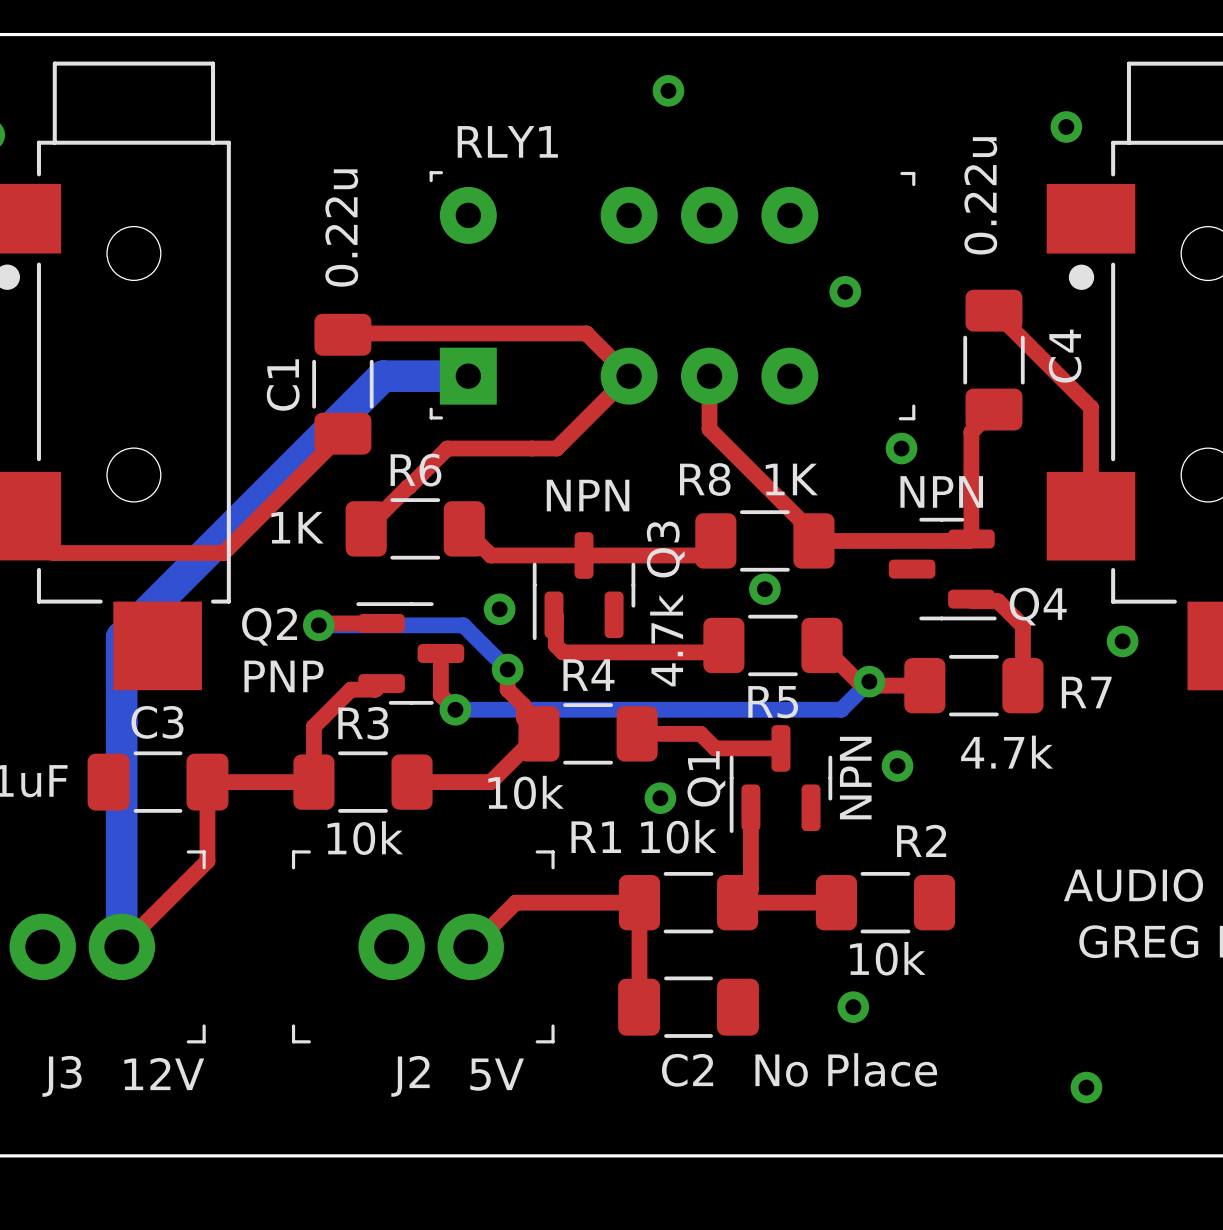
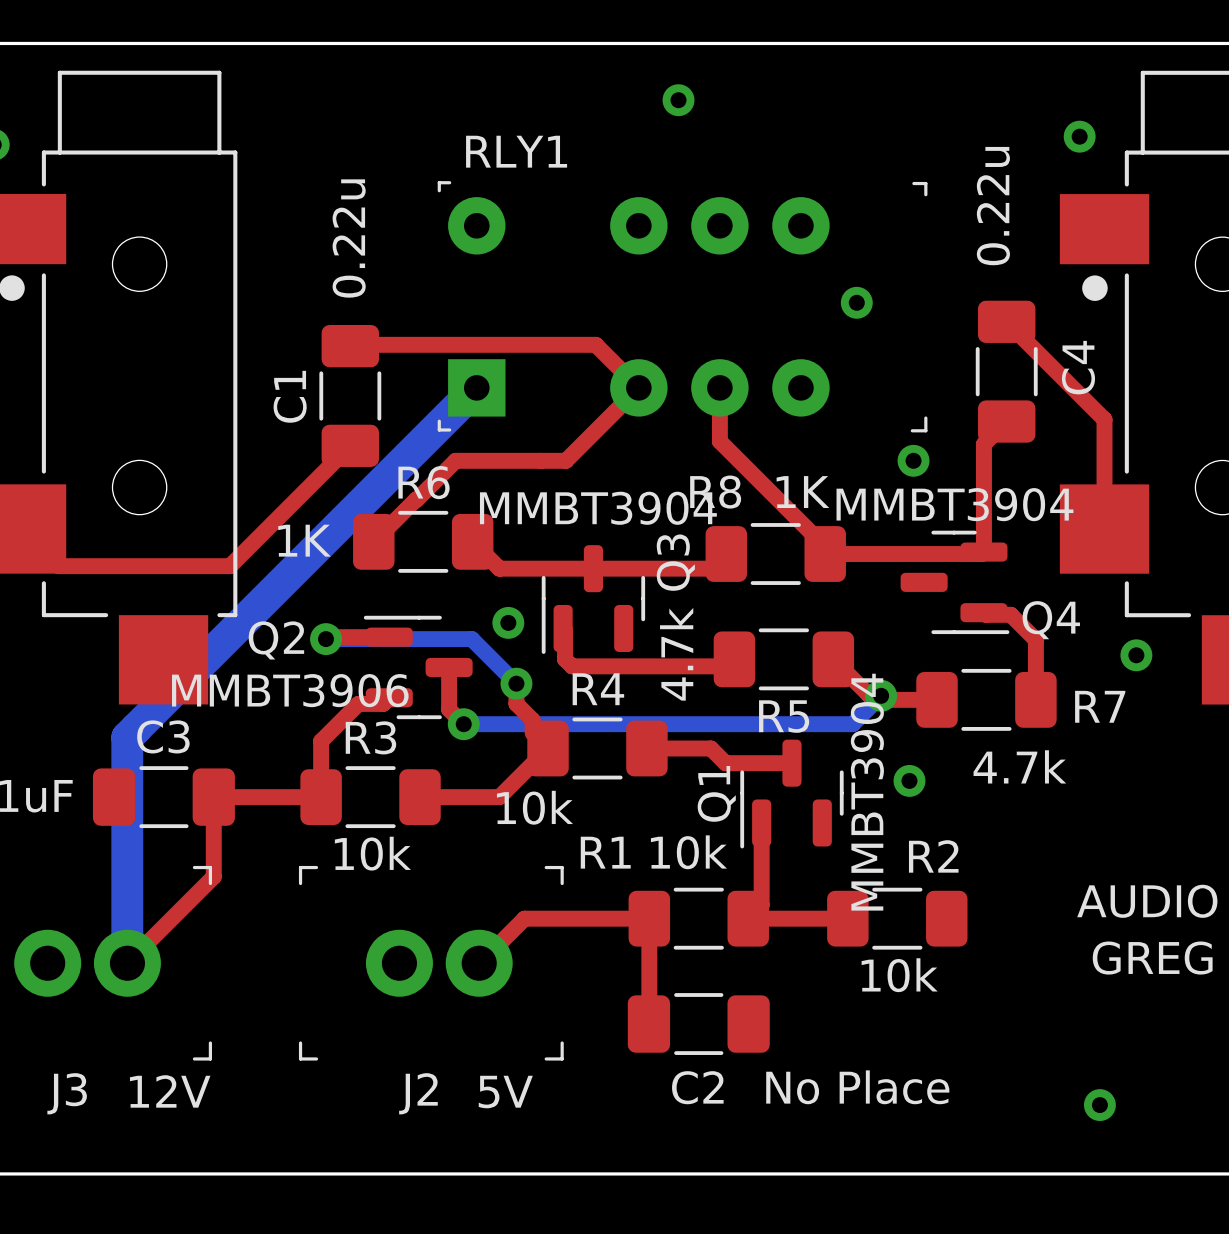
bottom track: (468, 376) (383, 376) (121, 637) (121, 722) -> (476, 387) (127, 737)
Q4 value: NPN (941, 491) -> MMBT3904 (954, 504)
Q3 value: NPN (588, 495) -> MMBT3904 (598, 508)
via: (764, 589) -> none
Q2 value: PNP (284, 676) -> MMBT3906 (290, 690)
Q1 value: NPN (855, 778) -> MMBT3904 (867, 792)
via: (660, 798) -> none
via: (853, 1007) -> none

